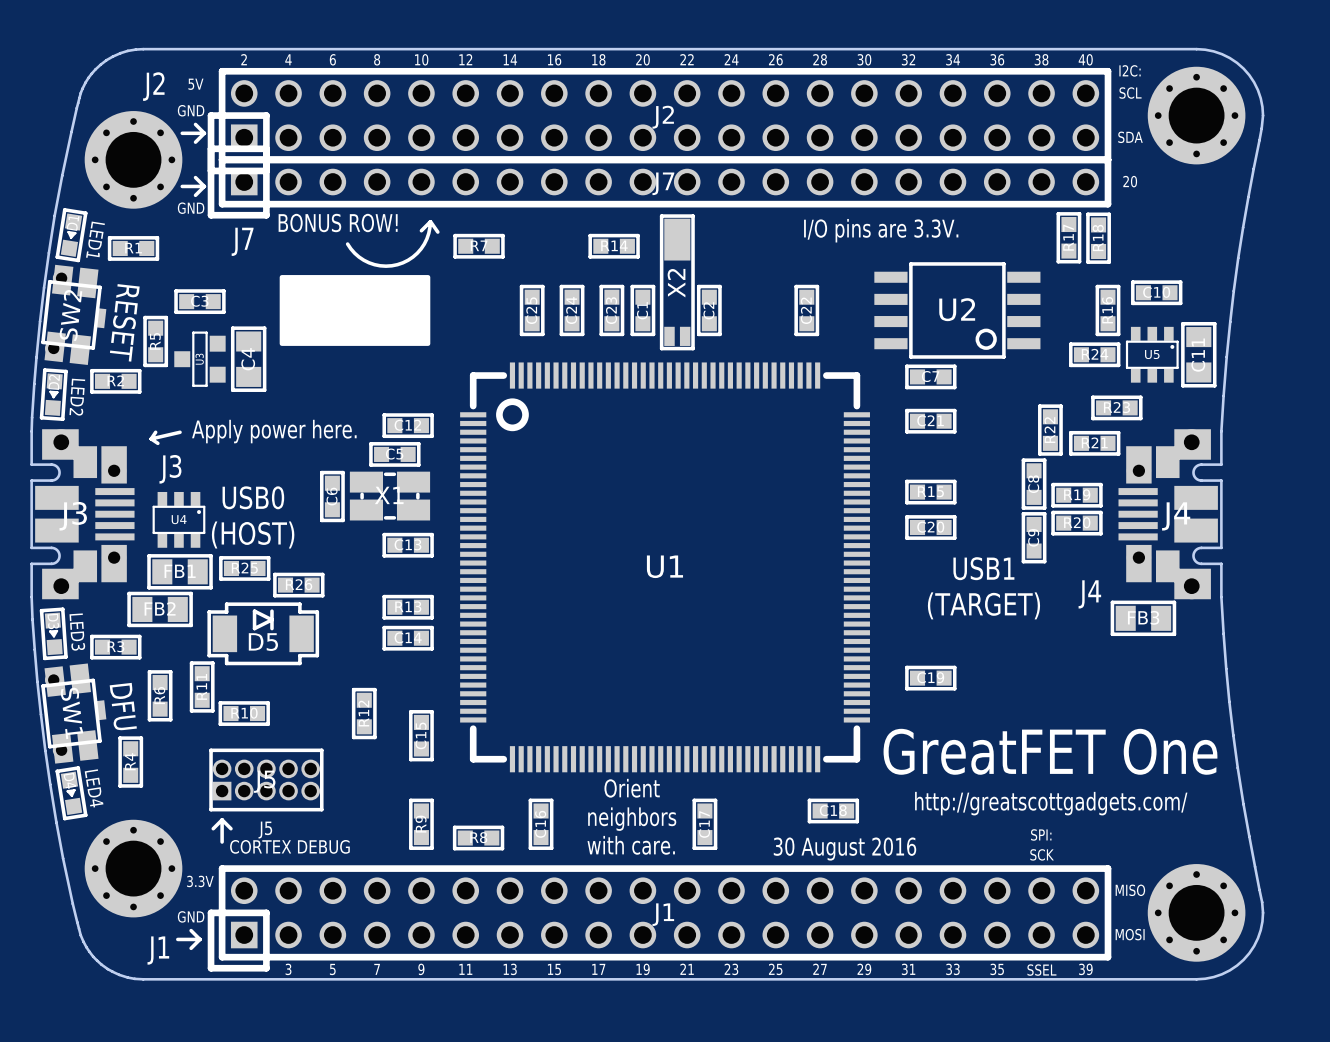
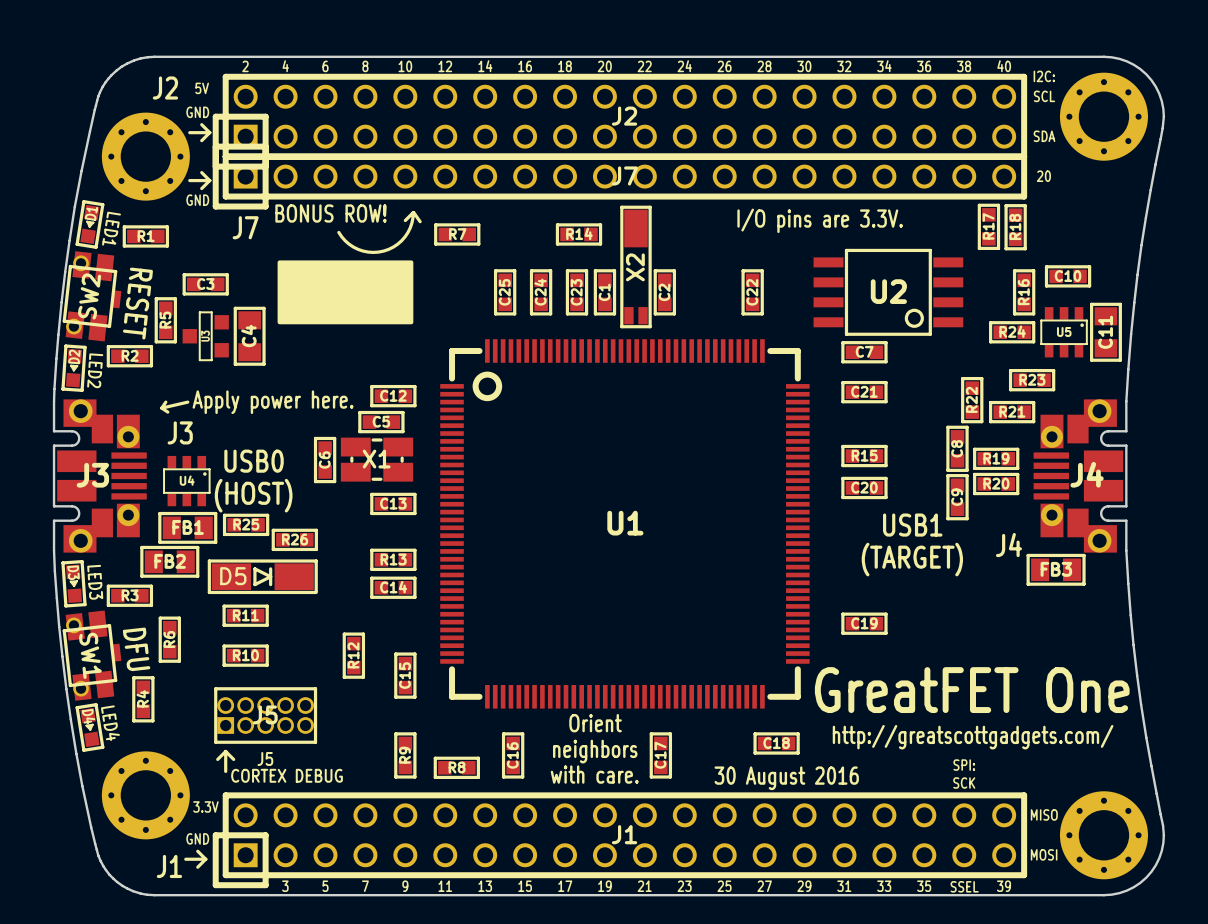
D5 footprint: [207, 602, 320, 666] -> [207, 559, 318, 595]
R11 rotation: 0° (202, 686) -> 90° clockwise (245, 615)
R11 position: (202, 686) -> (245, 615)

